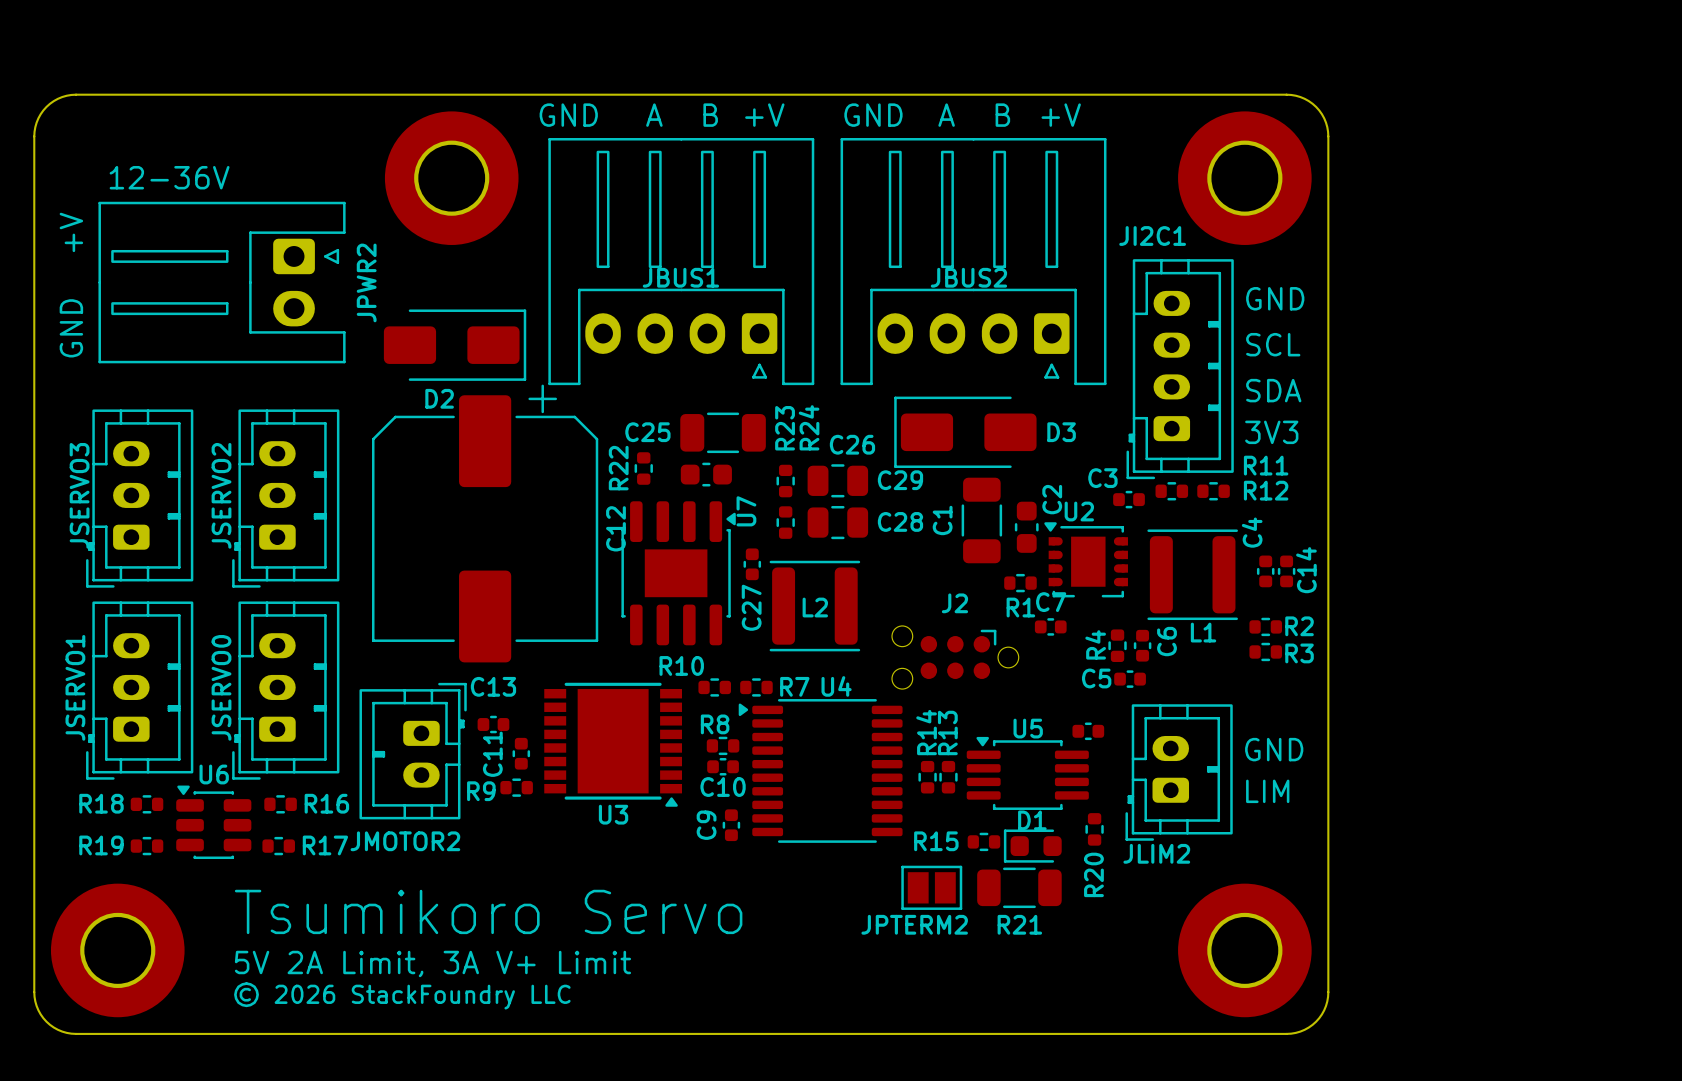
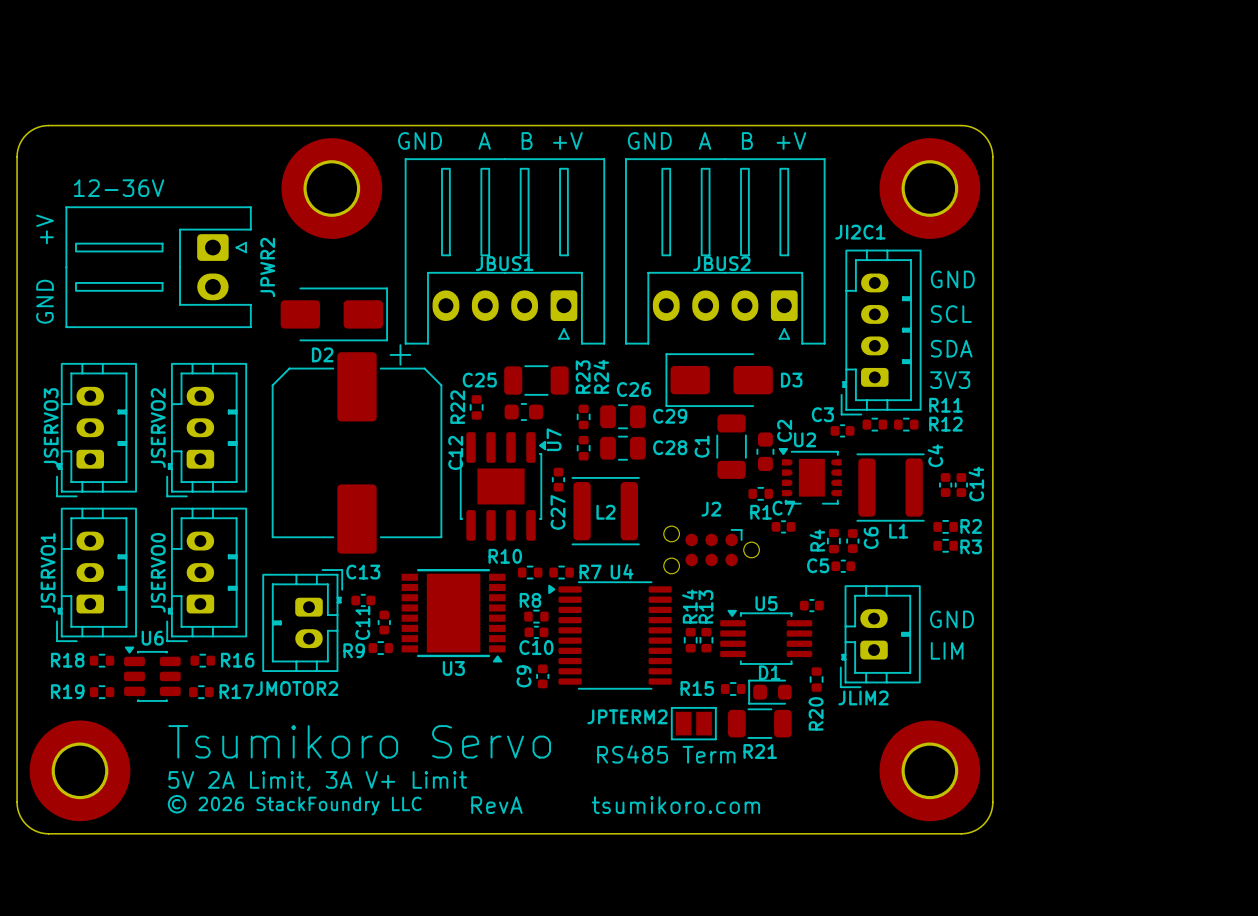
JPTERM2 name position: JPTERM2 (914, 924) -> JPTERM2 (627, 716)
text: none -> RS485 Term (666, 754)
text: none -> RevA (496, 805)
text: none -> tsumikoro.com (675, 805)

